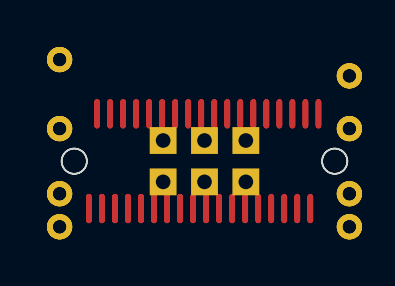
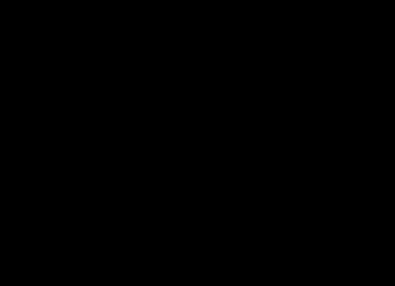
part: (204, 143) -> none
part: (204, 161) -> none

